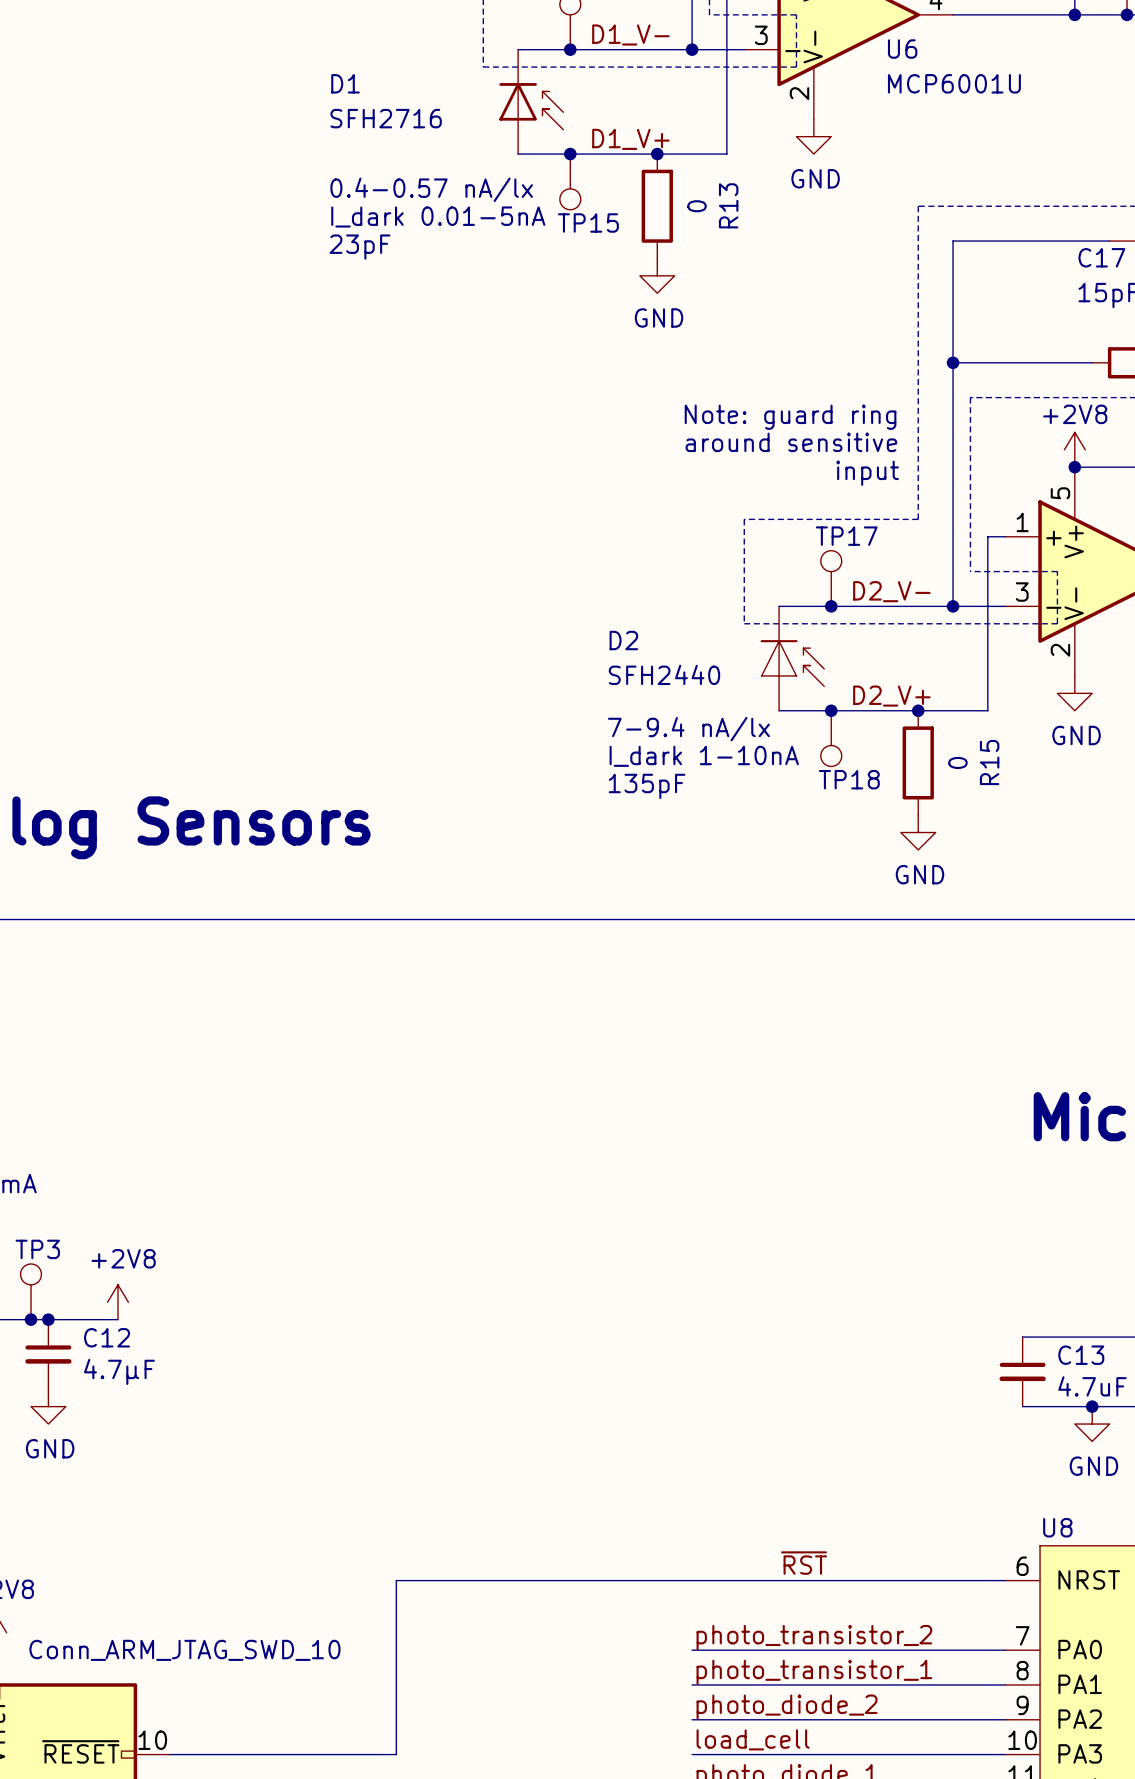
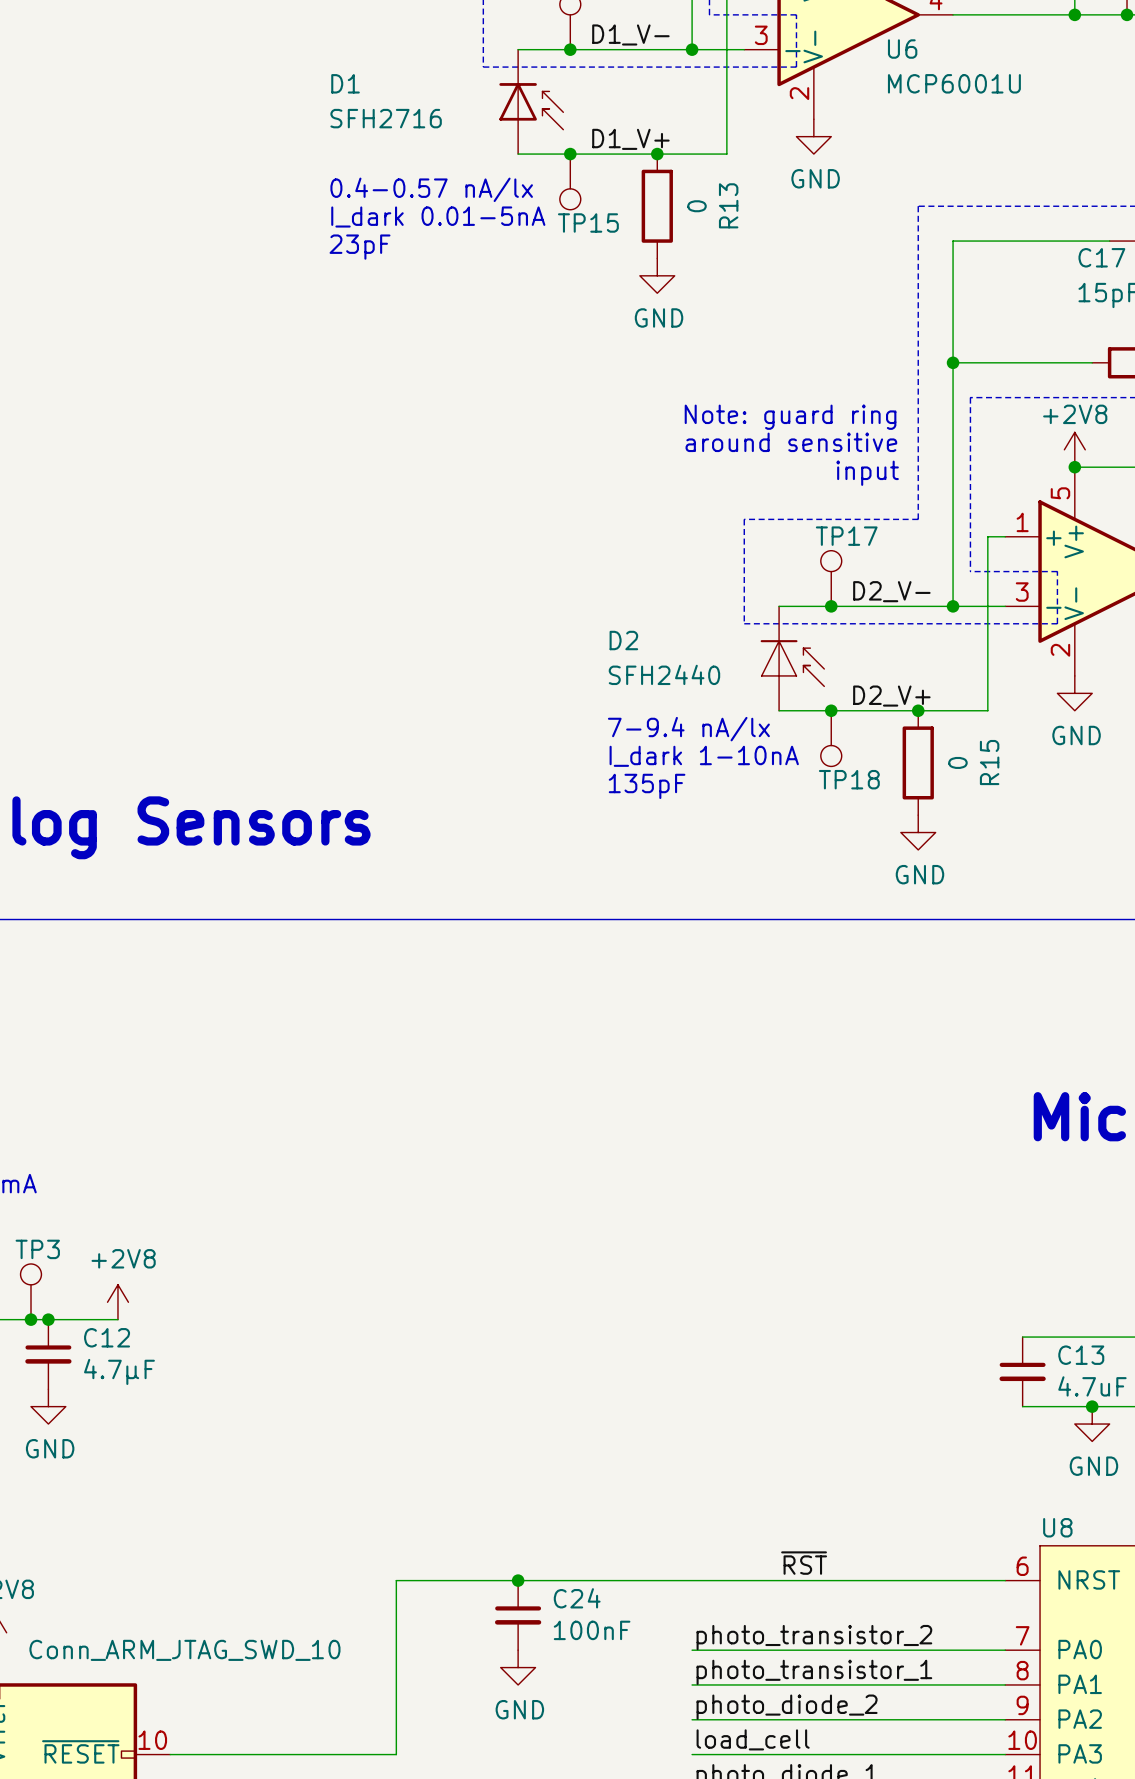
junction: none -> (518, 1580)
C24: none -> 100nF (518, 1615)
power symbol: none -> GND (518, 1667)

